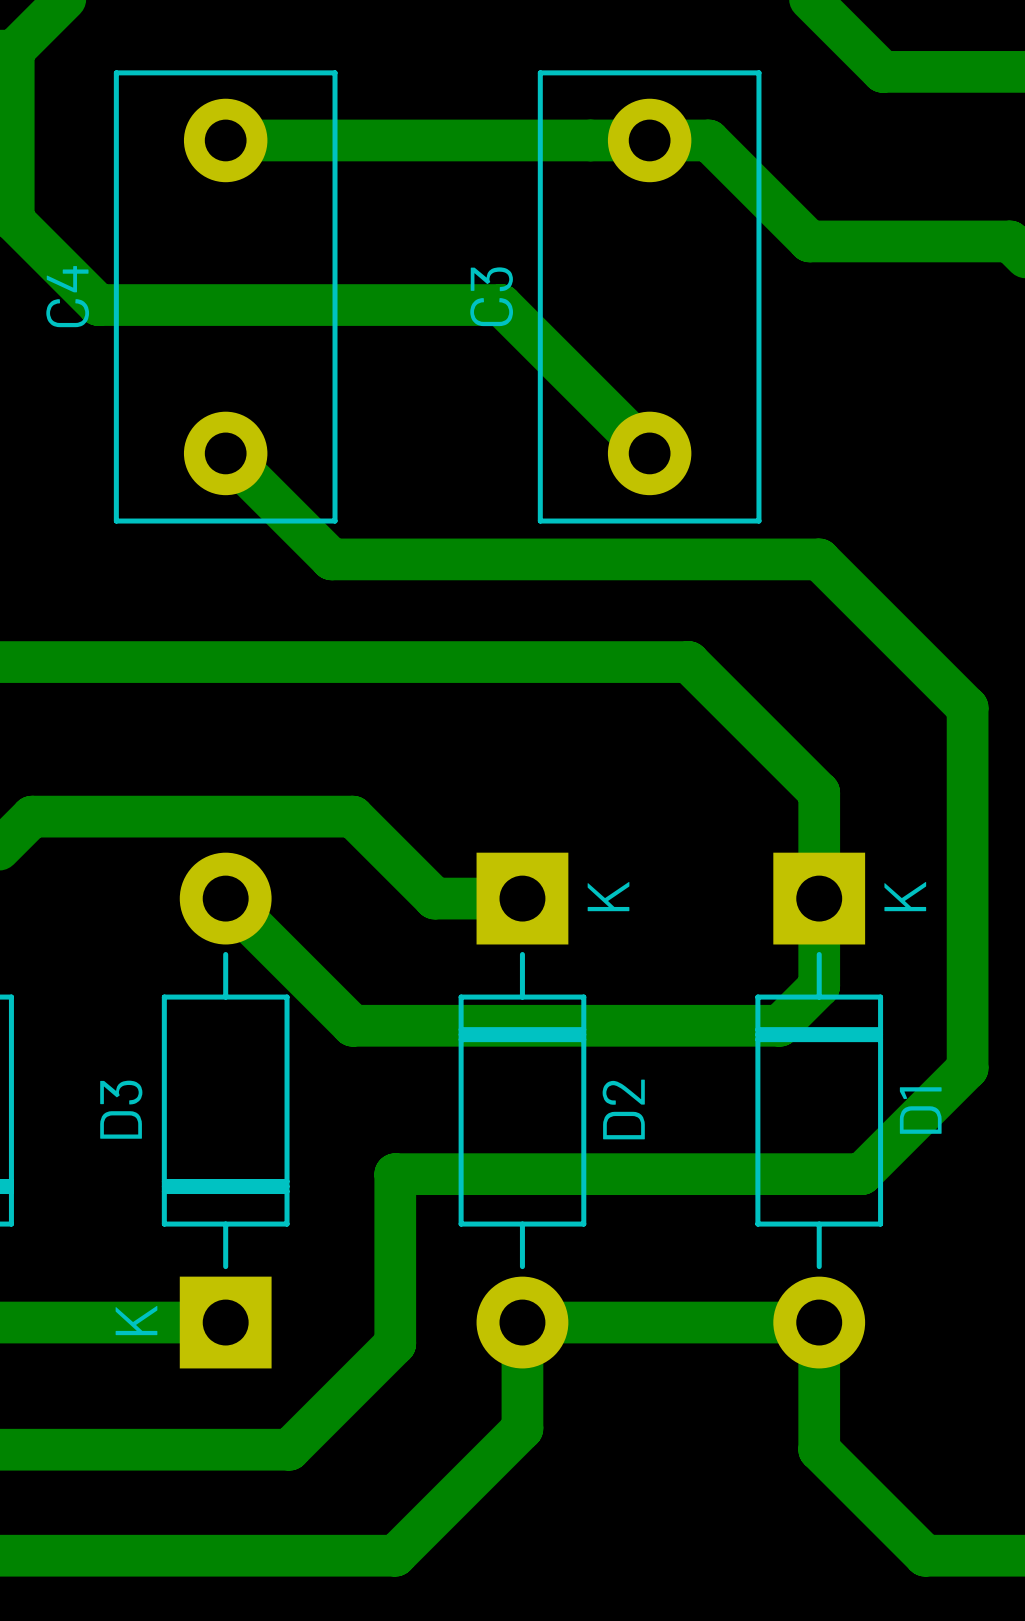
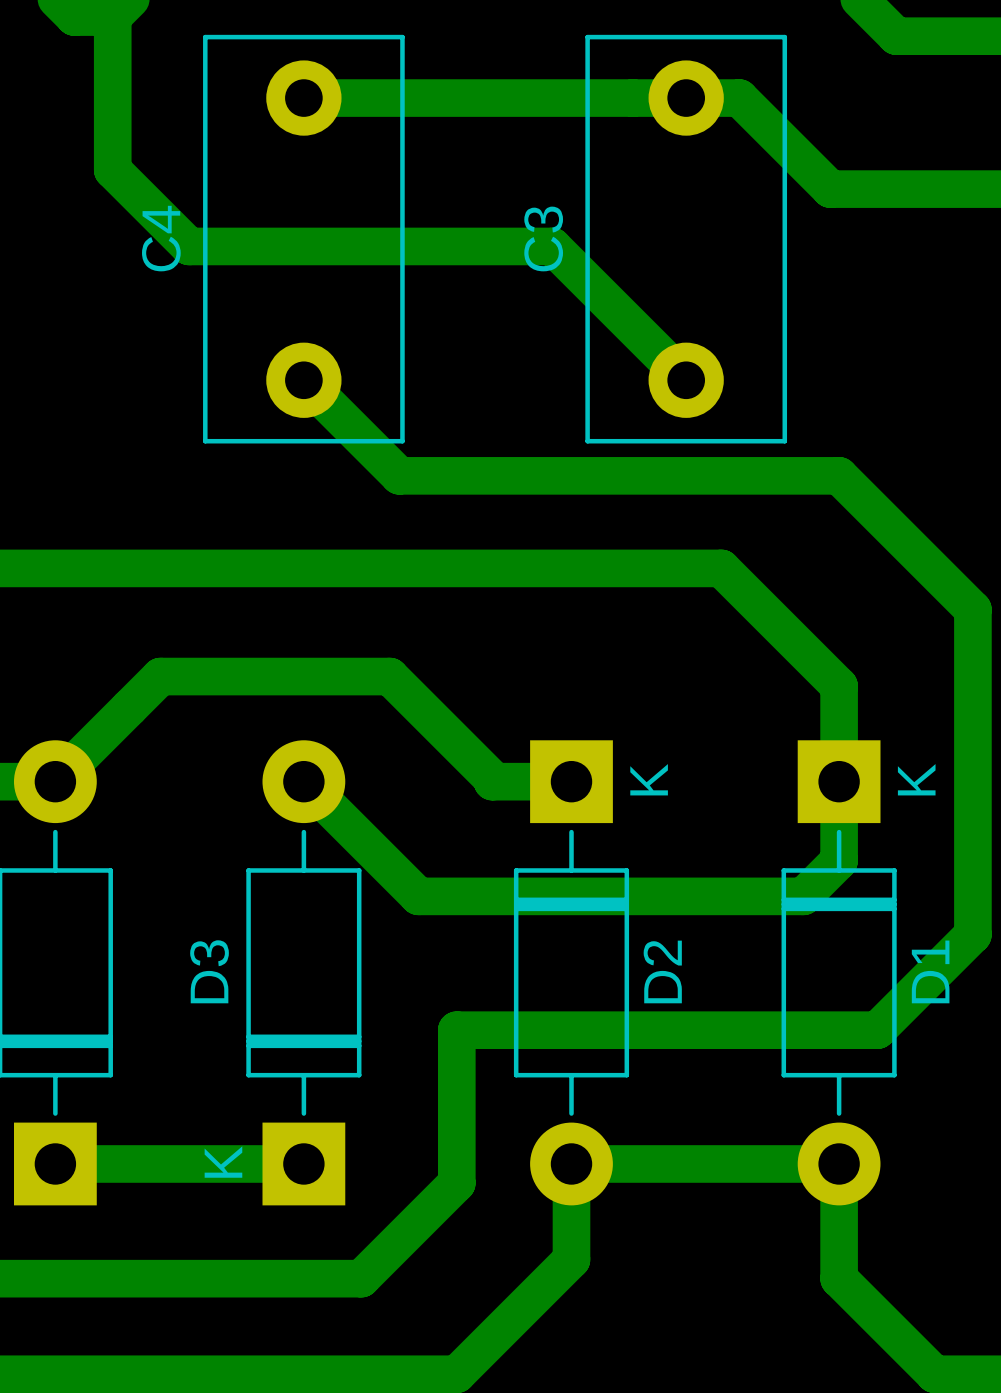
bottom track: (32, 816) (352, 816) (434, 898) -> (129, 707) (160, 676) (389, 676) (492, 779) (492, 781)

